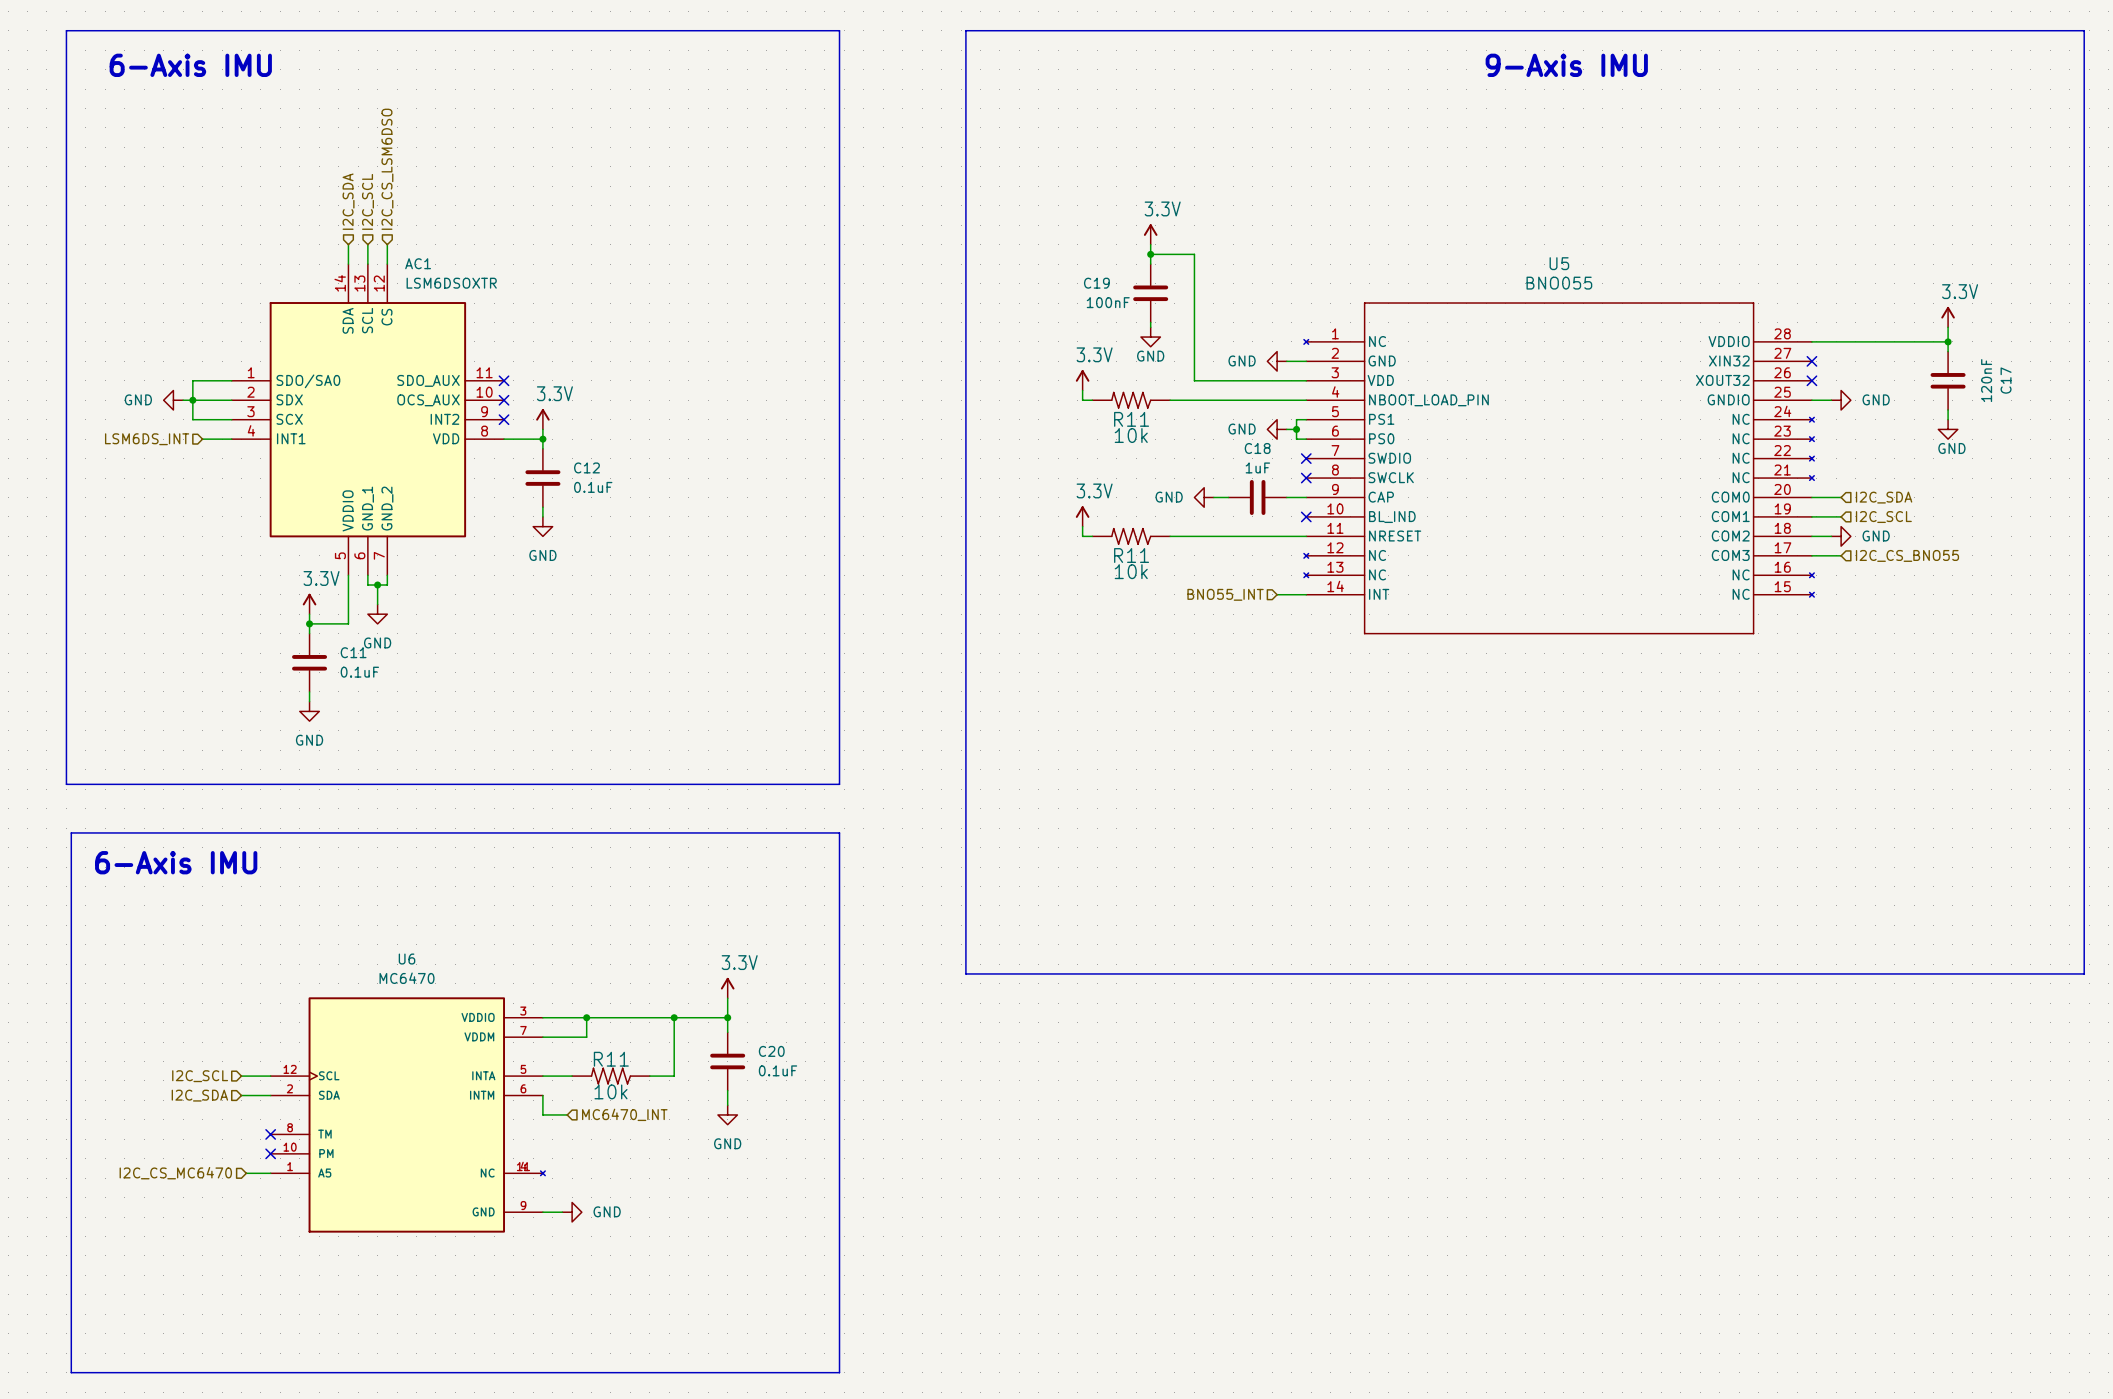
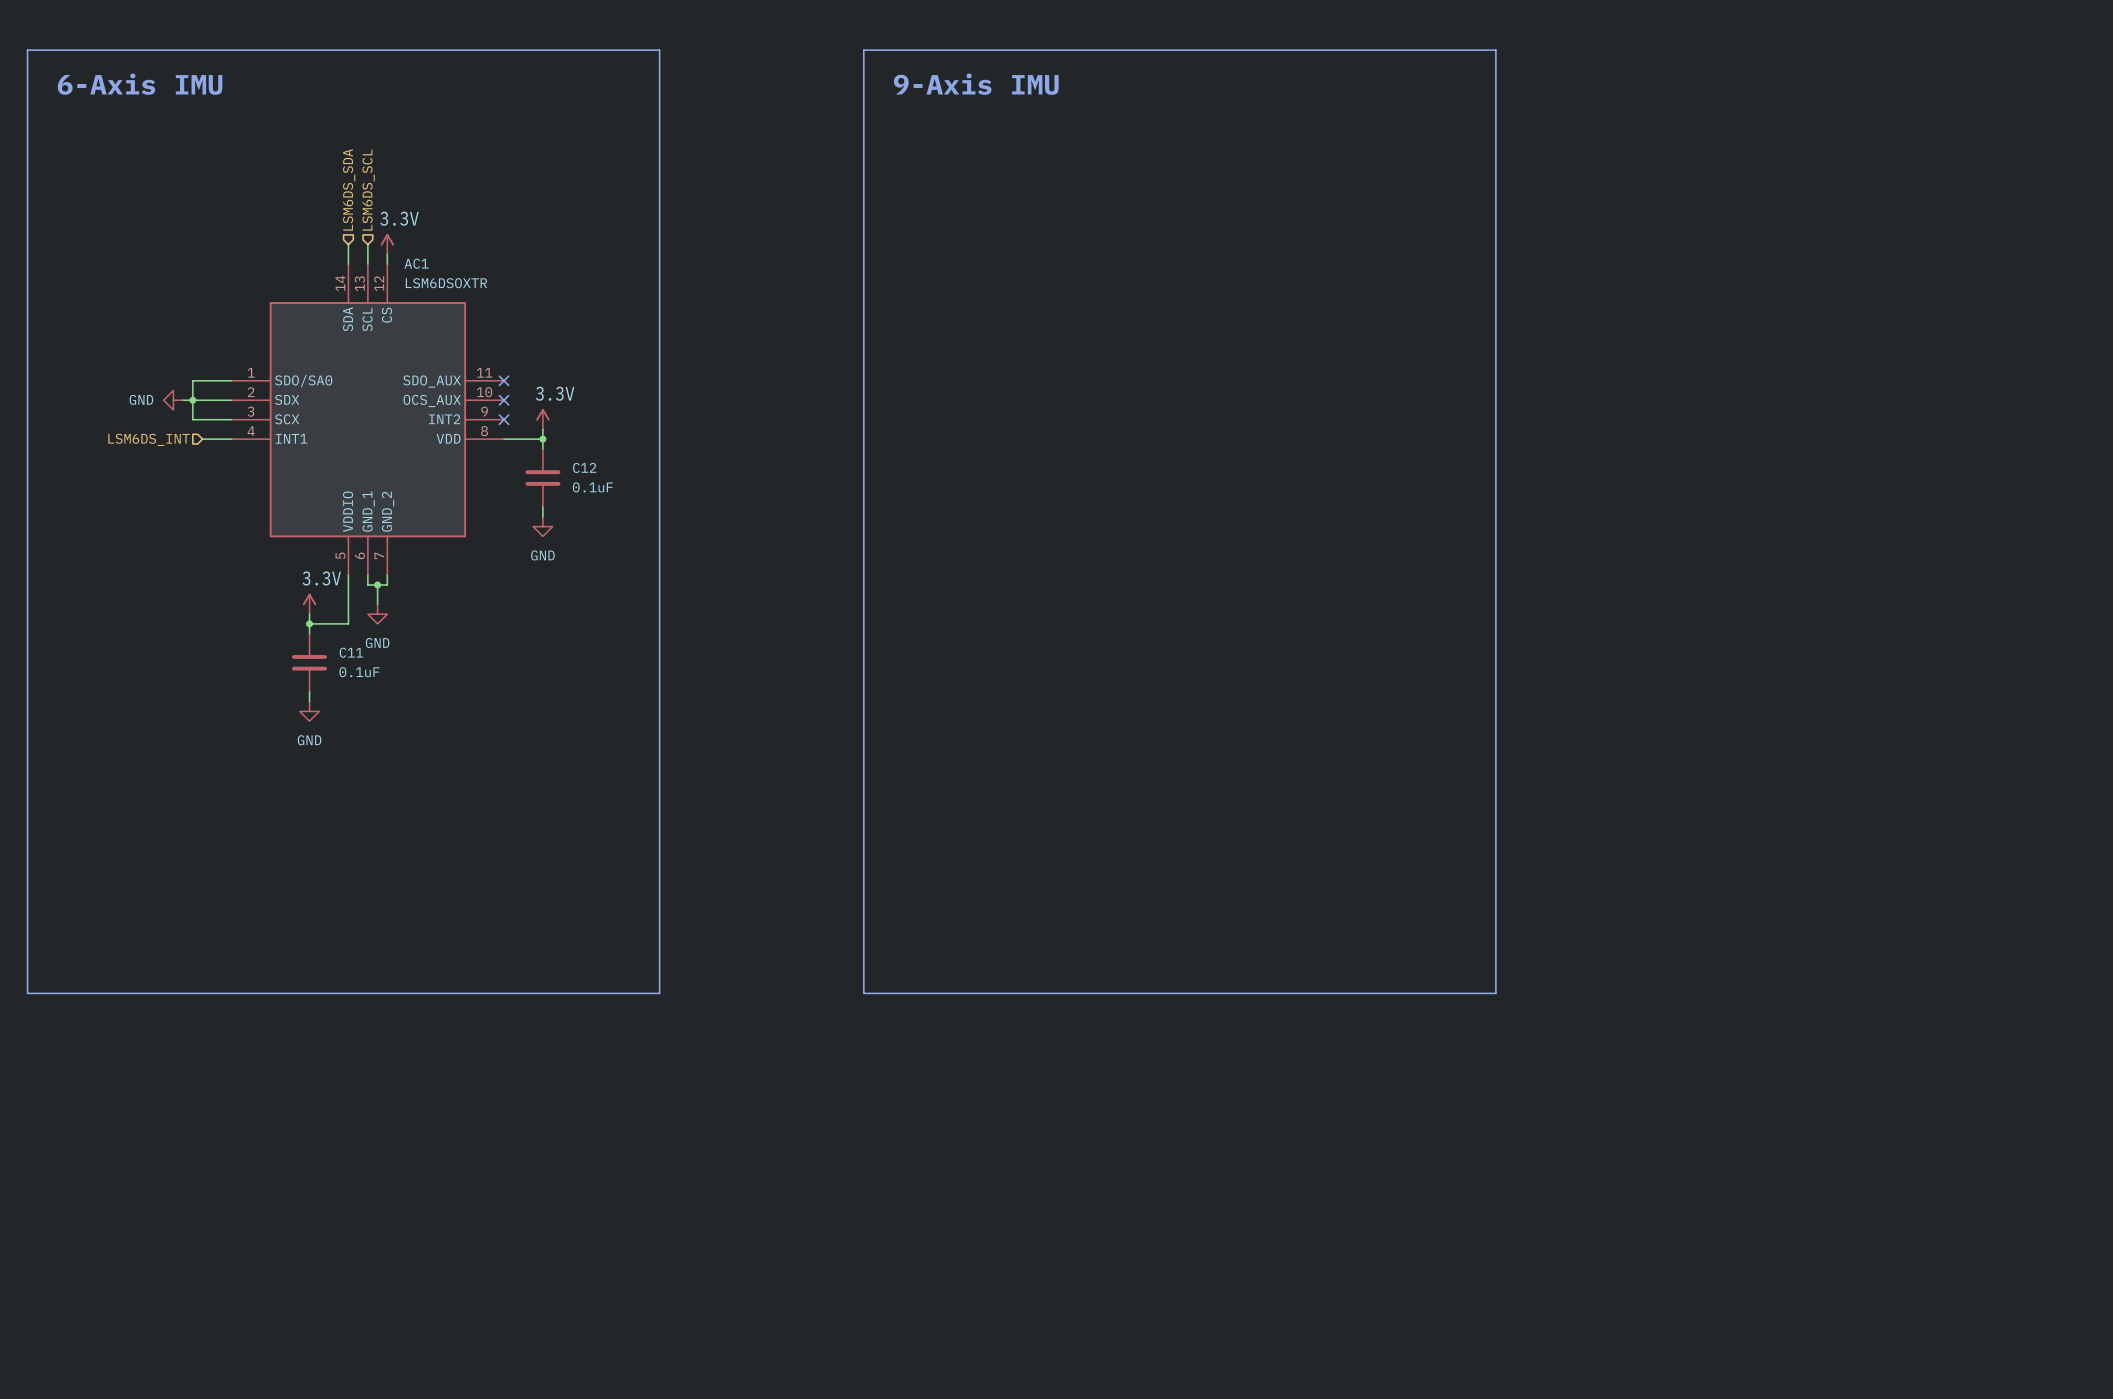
line: (66, 30) (839, 30) (839, 784) (66, 784) (66, 30) -> (27, 50) (27, 993) (659, 993) (659, 50) (27, 50)
line: (965, 30) (2084, 30) (2084, 973) (965, 973) (965, 30) -> none
line: none -> (863, 50) (1495, 50) (1495, 993) (863, 993) (863, 50)
text position: 6-Axis IMU (190, 65) -> 6-Axis IMU (140, 84)
text: 9-Axis IMU (1566, 65) -> none
text: none -> 9-Axis IMU (976, 84)
hierarchical label: I2C_CS_LSM6DSO (387, 169) -> none
hierarchical label: I2C_SDA (348, 201) -> LSM6DS_SDA (349, 189)
hierarchical label: I2C_SCL (367, 201) -> LSM6DS_SCL (368, 190)
power symbol: 3.3V (1150, 234) -> none
power symbol: none -> 3.3V (387, 244)
wire: (1150, 244) (1150, 264) -> none
wire: (1150, 254) (1194, 254) (1194, 380) (1306, 380) -> none
junction: (1150, 254) -> none
C19: 100nF (1150, 293) -> none
power symbol: 3.3V (1948, 317) -> none
wire: (1150, 322) (1150, 327) -> none
wire: (1948, 327) (1948, 351) -> none
power symbol: GND (1150, 337) -> none
wire: (1811, 341) (1948, 341) -> none
junction: (1948, 341) -> none
power symbol: GND (1277, 361) -> none
wire: (1286, 361) (1306, 361) -> none
no-connect mark: (1811, 361) -> none
power symbol: 3.3V (1082, 380) -> none
no-connect mark: (1811, 380) -> none
C17: 120nF (1948, 380) -> none
wire: (1082, 390) (1082, 400) (1092, 400) -> none
R11: 10k (1131, 400) -> none
wire: (1170, 400) (1306, 400) -> none
wire: (1811, 400) (1831, 400) -> none
power symbol: GND (1841, 400) -> none
wire: (1948, 409) (1948, 419) -> none
wire: (1306, 419) (1296, 419) (1296, 439) (1306, 439) -> none
power symbol: GND (1277, 429) -> none
wire: (1286, 429) (1296, 429) -> none
junction: (1296, 429) -> none
power symbol: GND (1948, 429) -> none
no-connect mark: (1306, 458) -> none
U5: BNO055 (1559, 468) -> none
no-connect mark: (1306, 478) -> none
power symbol: GND (1204, 497) -> none
wire: (1213, 497) (1228, 497) -> none
C18: 1uF (1257, 497) -> none
wire: (1286, 497) (1306, 497) -> none
wire: (1811, 497) (1841, 497) -> none
hierarchical label: I2C_SDA (1884, 497) -> none
power symbol: 3.3V (1082, 516) -> none
no-connect mark: (1306, 516) -> none
wire: (1811, 516) (1841, 516) -> none
hierarchical label: I2C_SCL (1883, 517) -> none
wire: (1082, 526) (1082, 536) (1092, 536) -> none
R11: 10k (1131, 536) -> none
wire: (1170, 536) (1306, 536) -> none
wire: (1811, 536) (1831, 536) -> none
power symbol: GND (1841, 536) -> none
wire: (1811, 555) (1841, 555) -> none
hierarchical label: I2C_CS_BNO55 (1907, 555) -> none
hierarchical label: BNO55_INT (1225, 594) -> none
wire: (1277, 594) (1306, 594) -> none
line: (71, 832) (839, 832) (839, 1372) (71, 1372) (71, 832) -> none
text: 6-Axis IMU (176, 862) -> none
power symbol: 3.3V (727, 988) -> none
wire: (727, 998) (727, 1032) -> none
wire: (542, 1017) (727, 1017) -> none
wire: (586, 1017) (586, 1037) (542, 1037) -> none
junction: (586, 1017) -> none
wire: (674, 1017) (674, 1076) (649, 1076) -> none
junction: (674, 1017) -> none
junction: (727, 1017) -> none
C20: 0.1uF (727, 1061) -> none
hierarchical label: I2C_SCL (200, 1076) -> none
wire: (241, 1076) (270, 1076) -> none
wire: (542, 1076) (572, 1076) -> none
R11: 10k (610, 1076) -> none
wire: (727, 1090) (727, 1105) -> none
hierarchical label: I2C_SDA (199, 1095) -> none
wire: (241, 1095) (270, 1095) -> none
wire: (542, 1095) (542, 1114) (567, 1114) -> none
U6: MC6470 (407, 1114) -> none
hierarchical label: MC6470_INT (624, 1114) -> none
power symbol: GND (727, 1114) -> none
no-connect mark: (270, 1134) -> none
no-connect mark: (270, 1153) -> none
hierarchical label: I2C_CS_MC6470 (175, 1173) -> none
wire: (246, 1173) (270, 1173) -> none
wire: (542, 1212) (562, 1212) -> none
power symbol: GND (572, 1212) -> none

